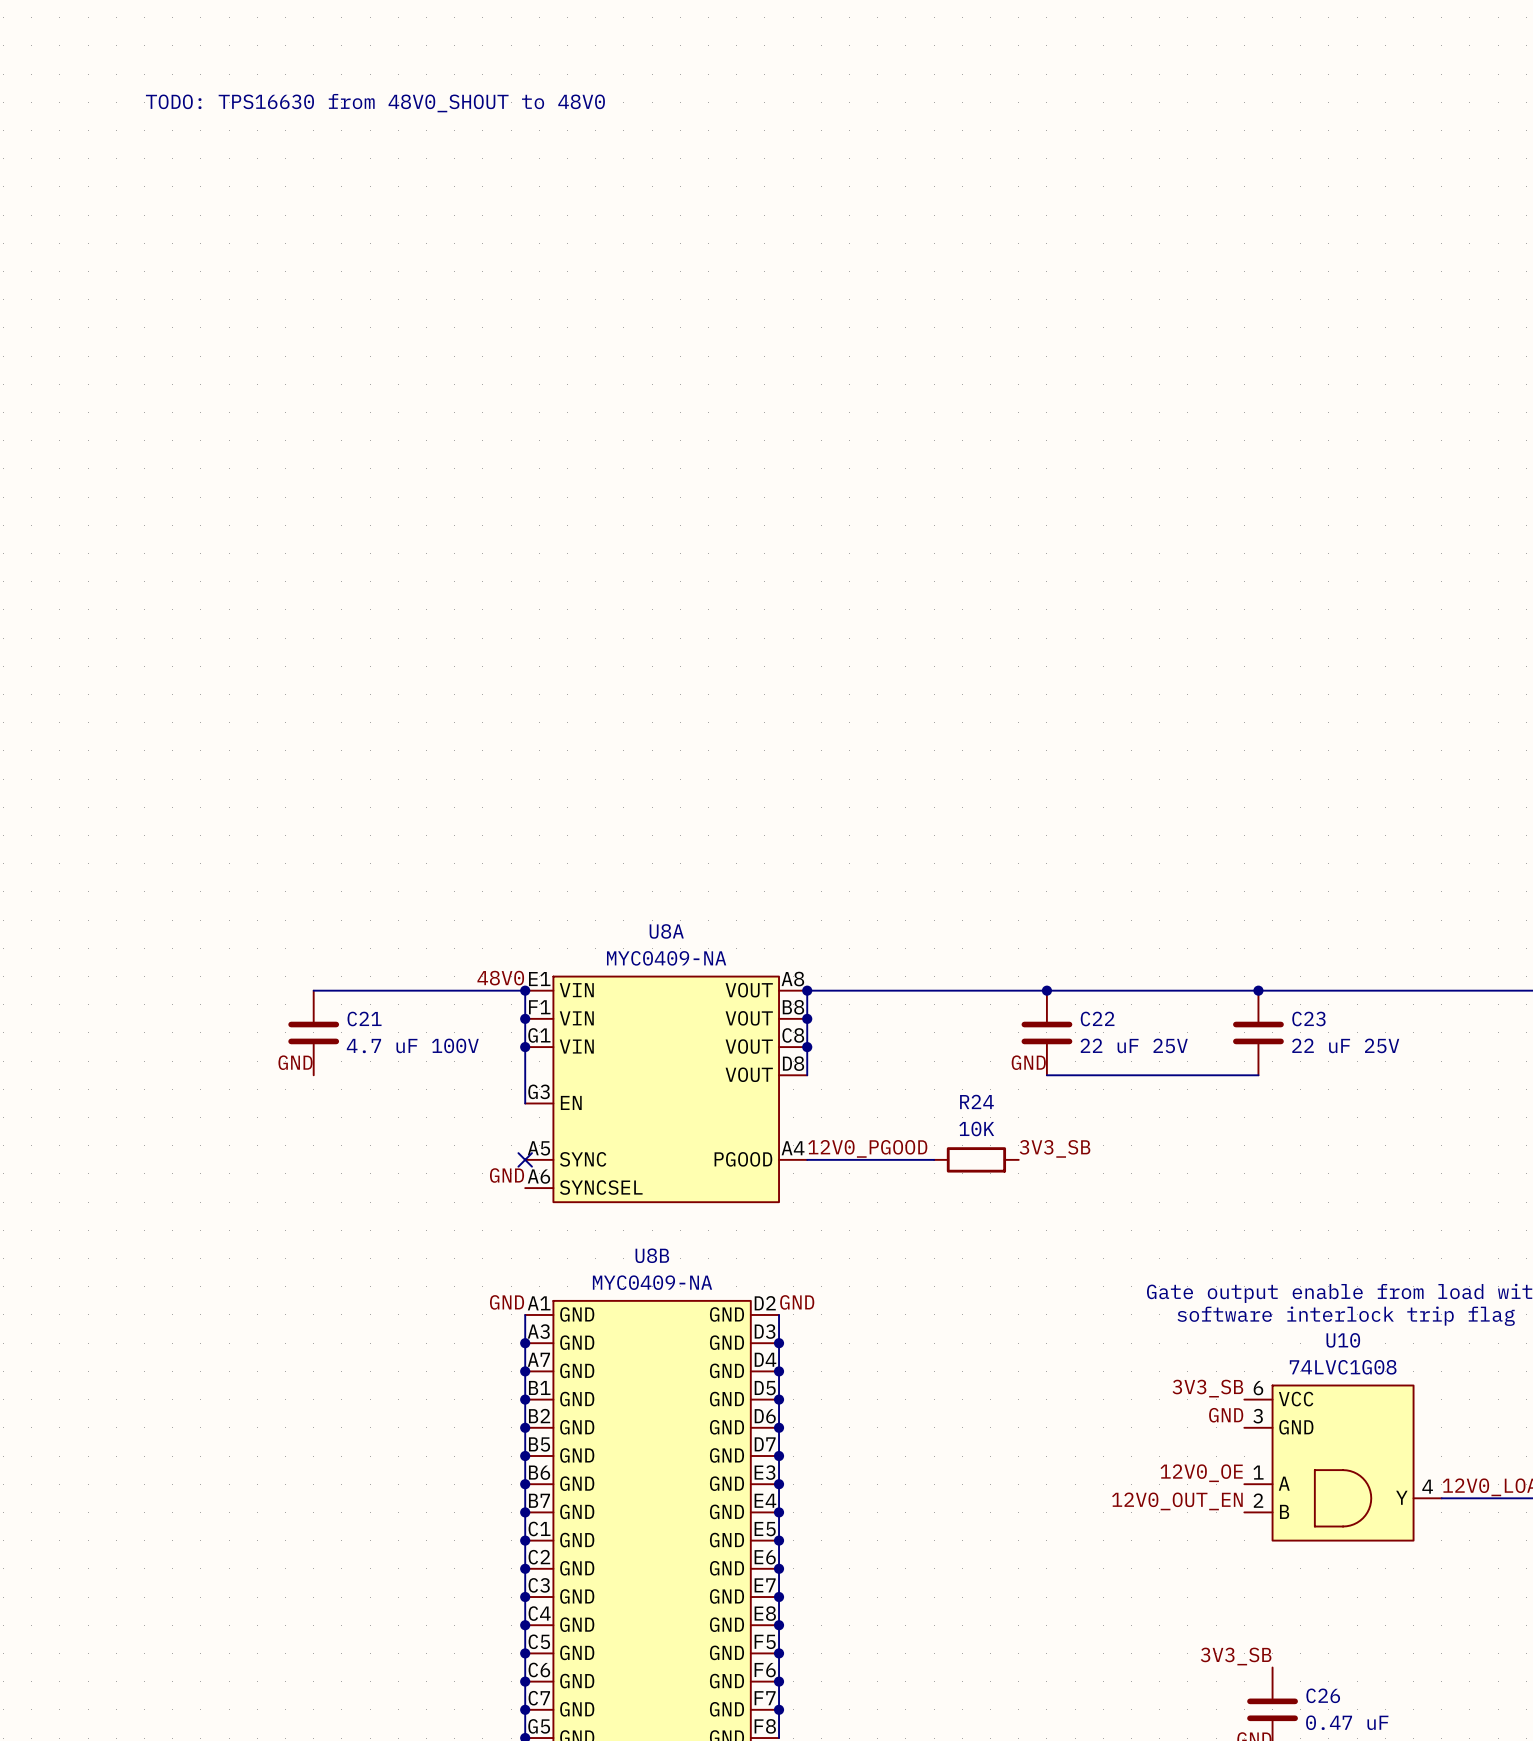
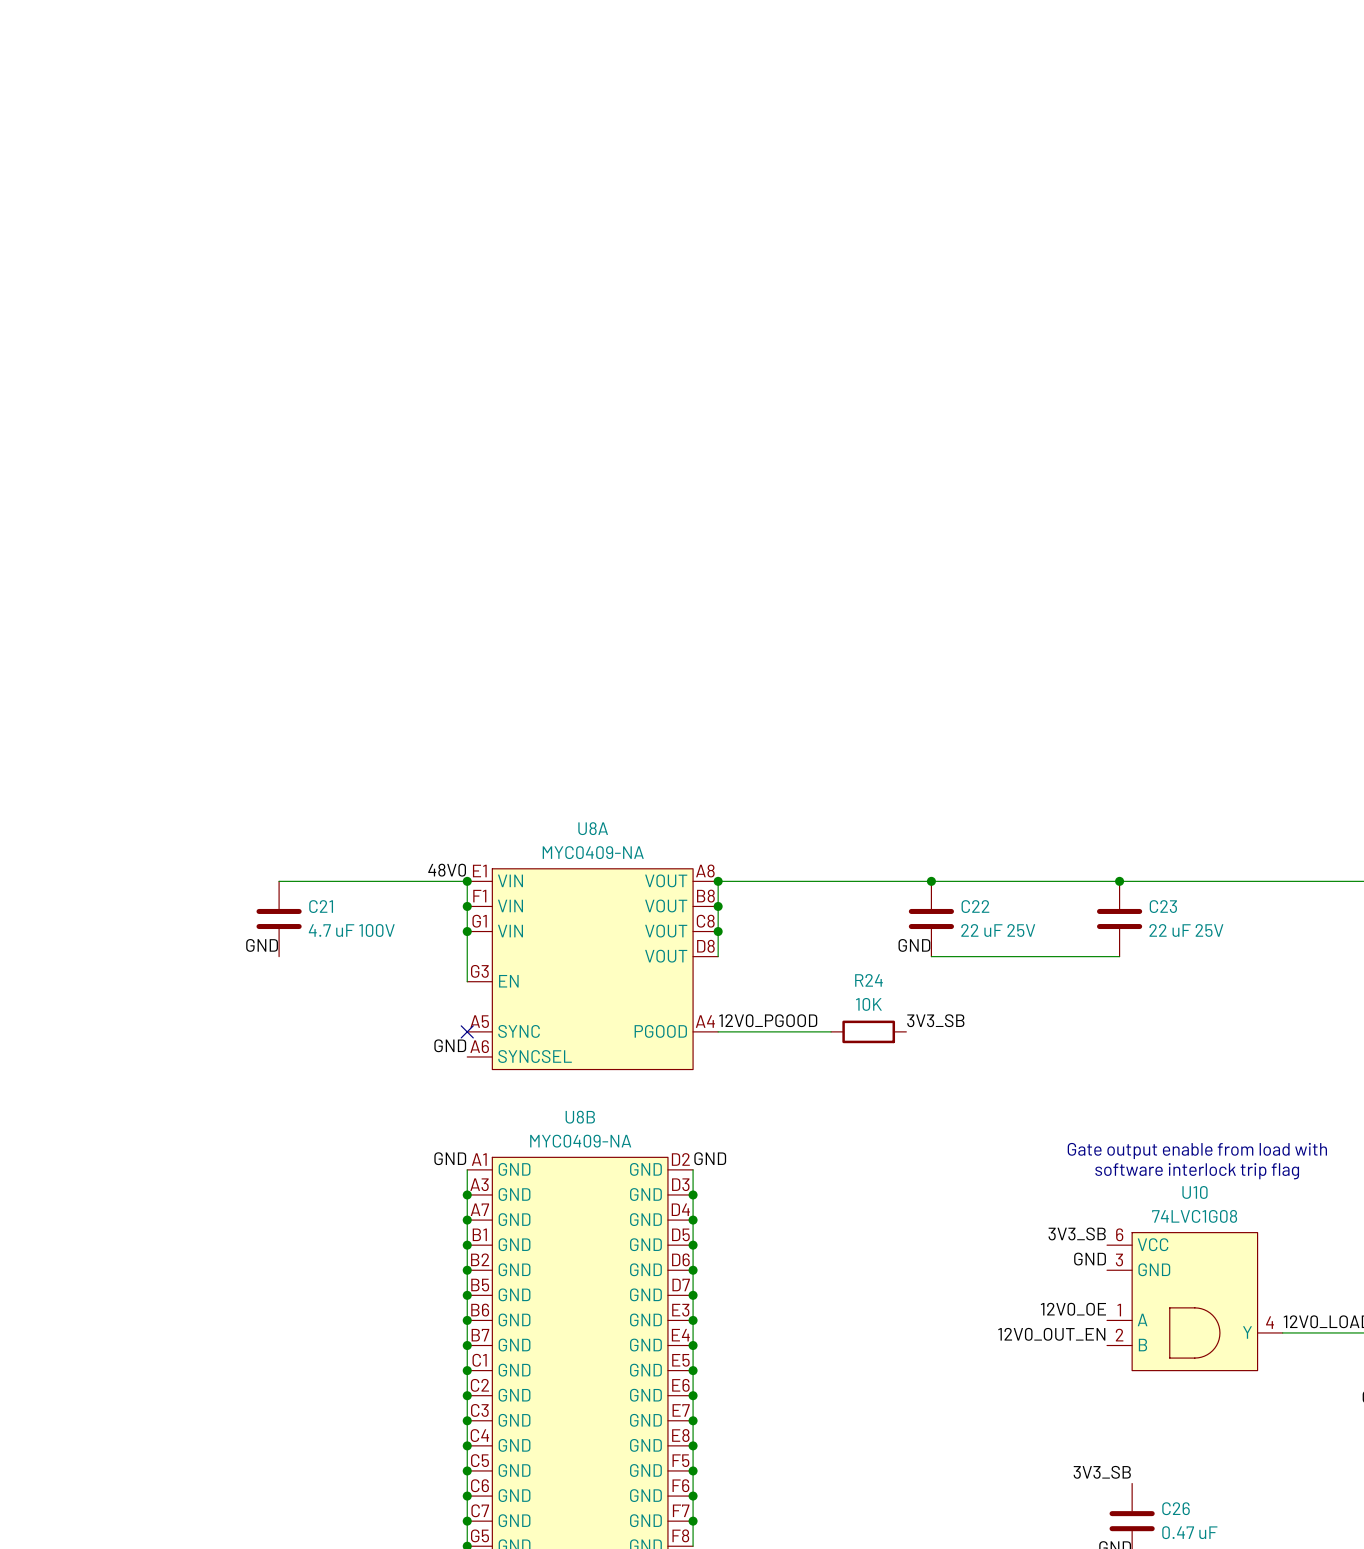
text: TODO: TPS16630 from 48V0_SHOUT to 48V0 (375, 103) -> none

